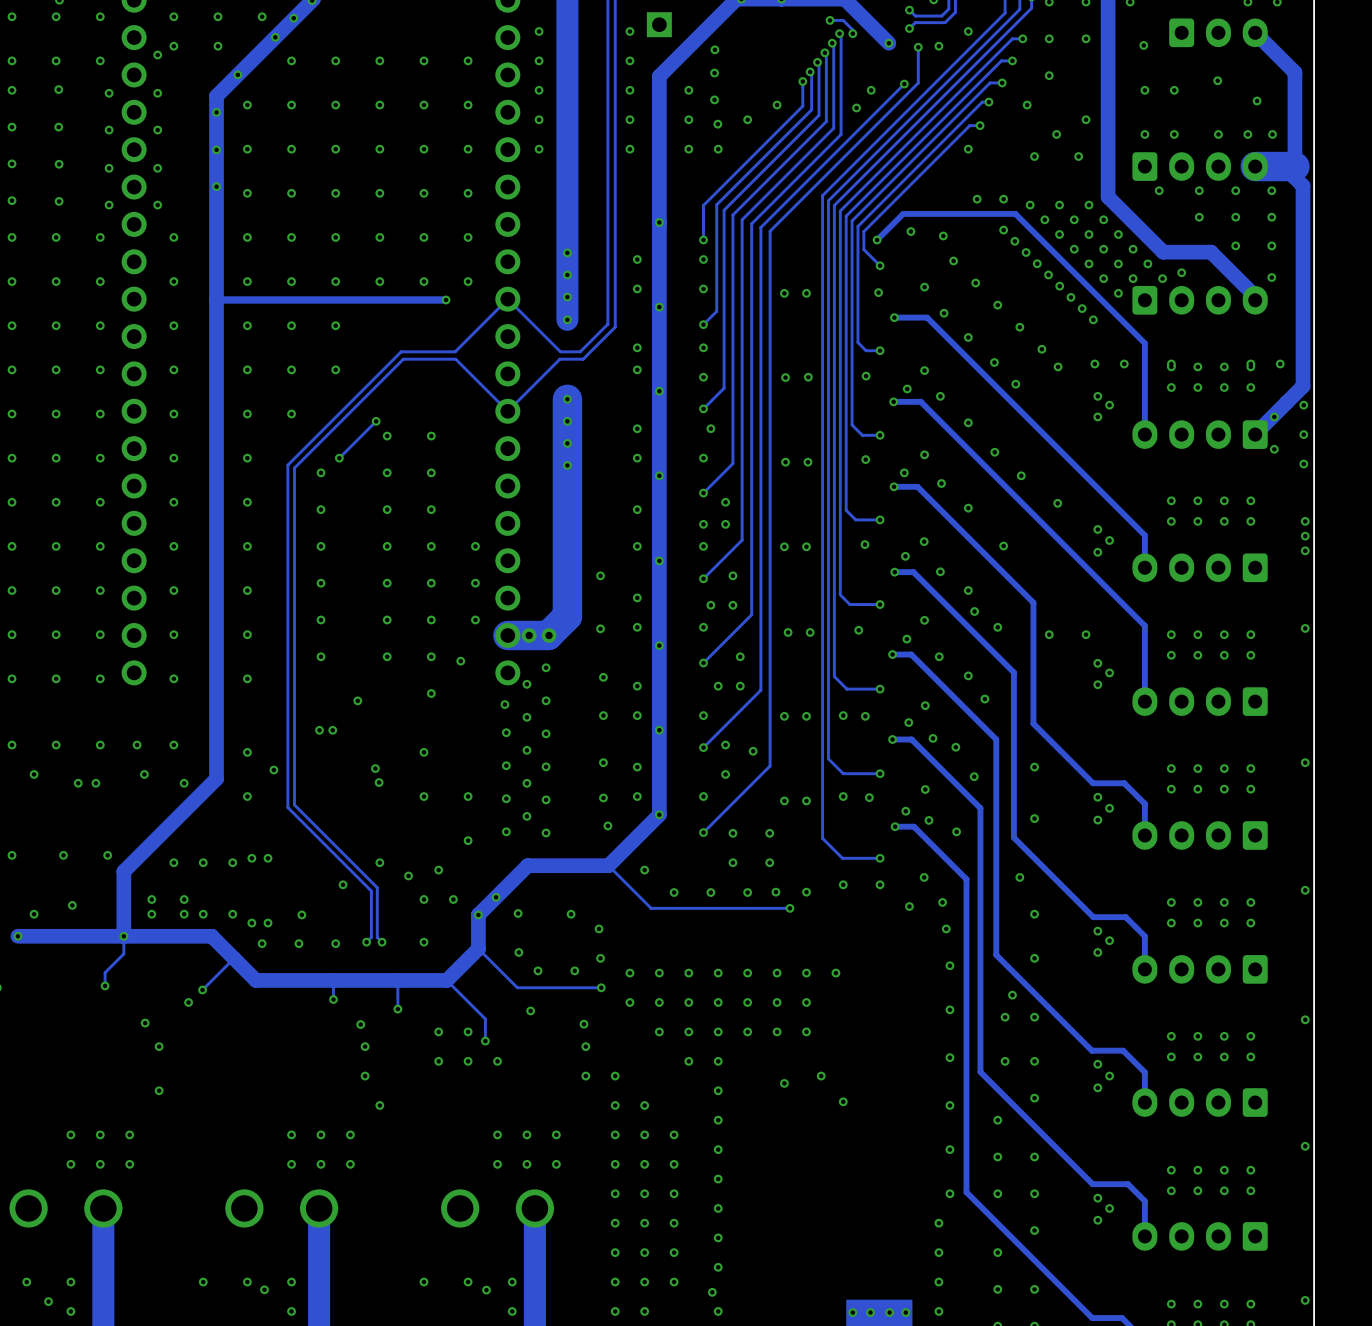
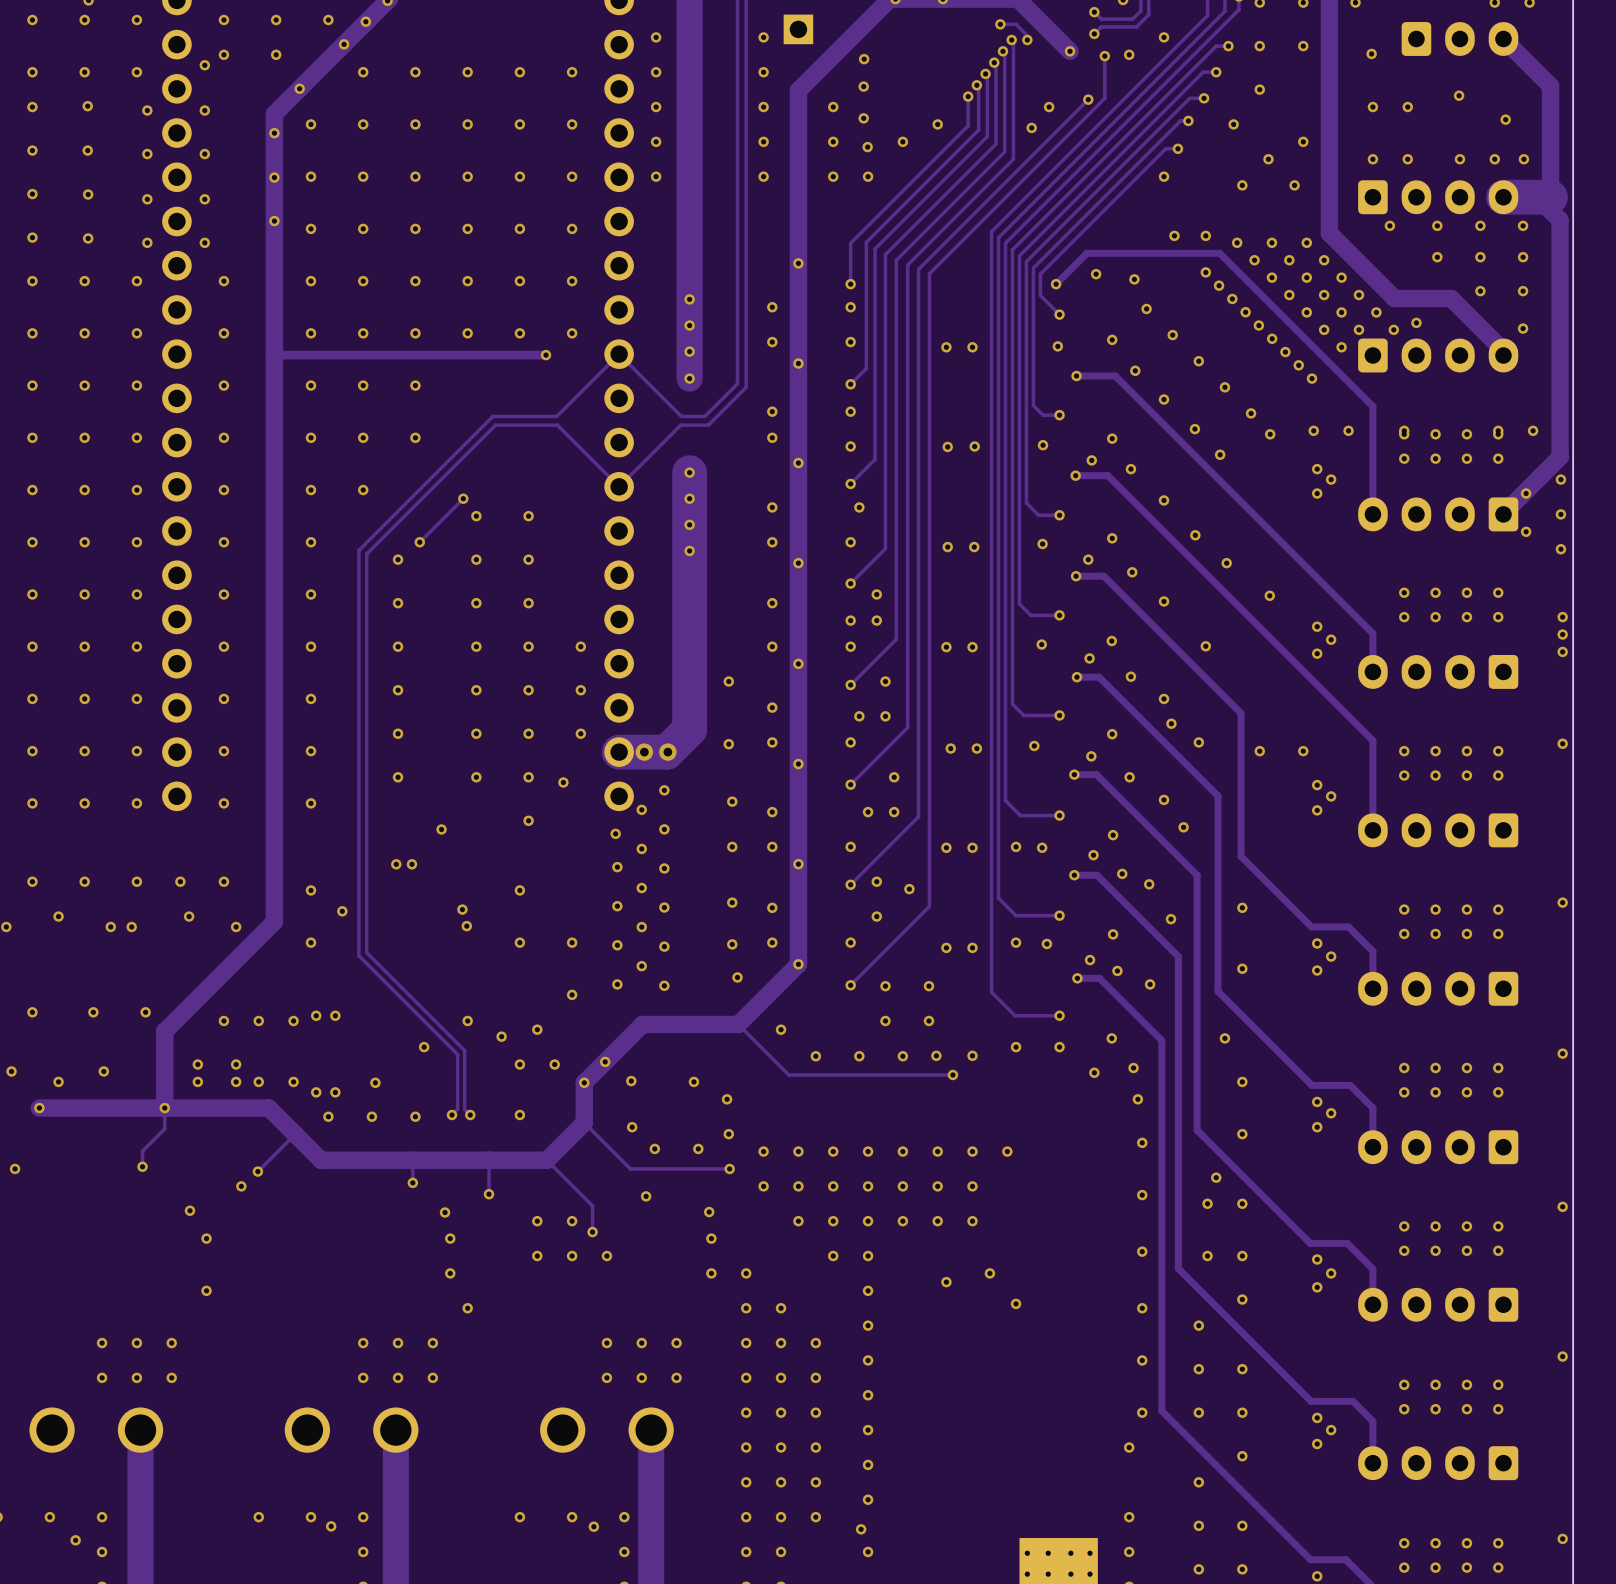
via: (938, 1252) -> none

